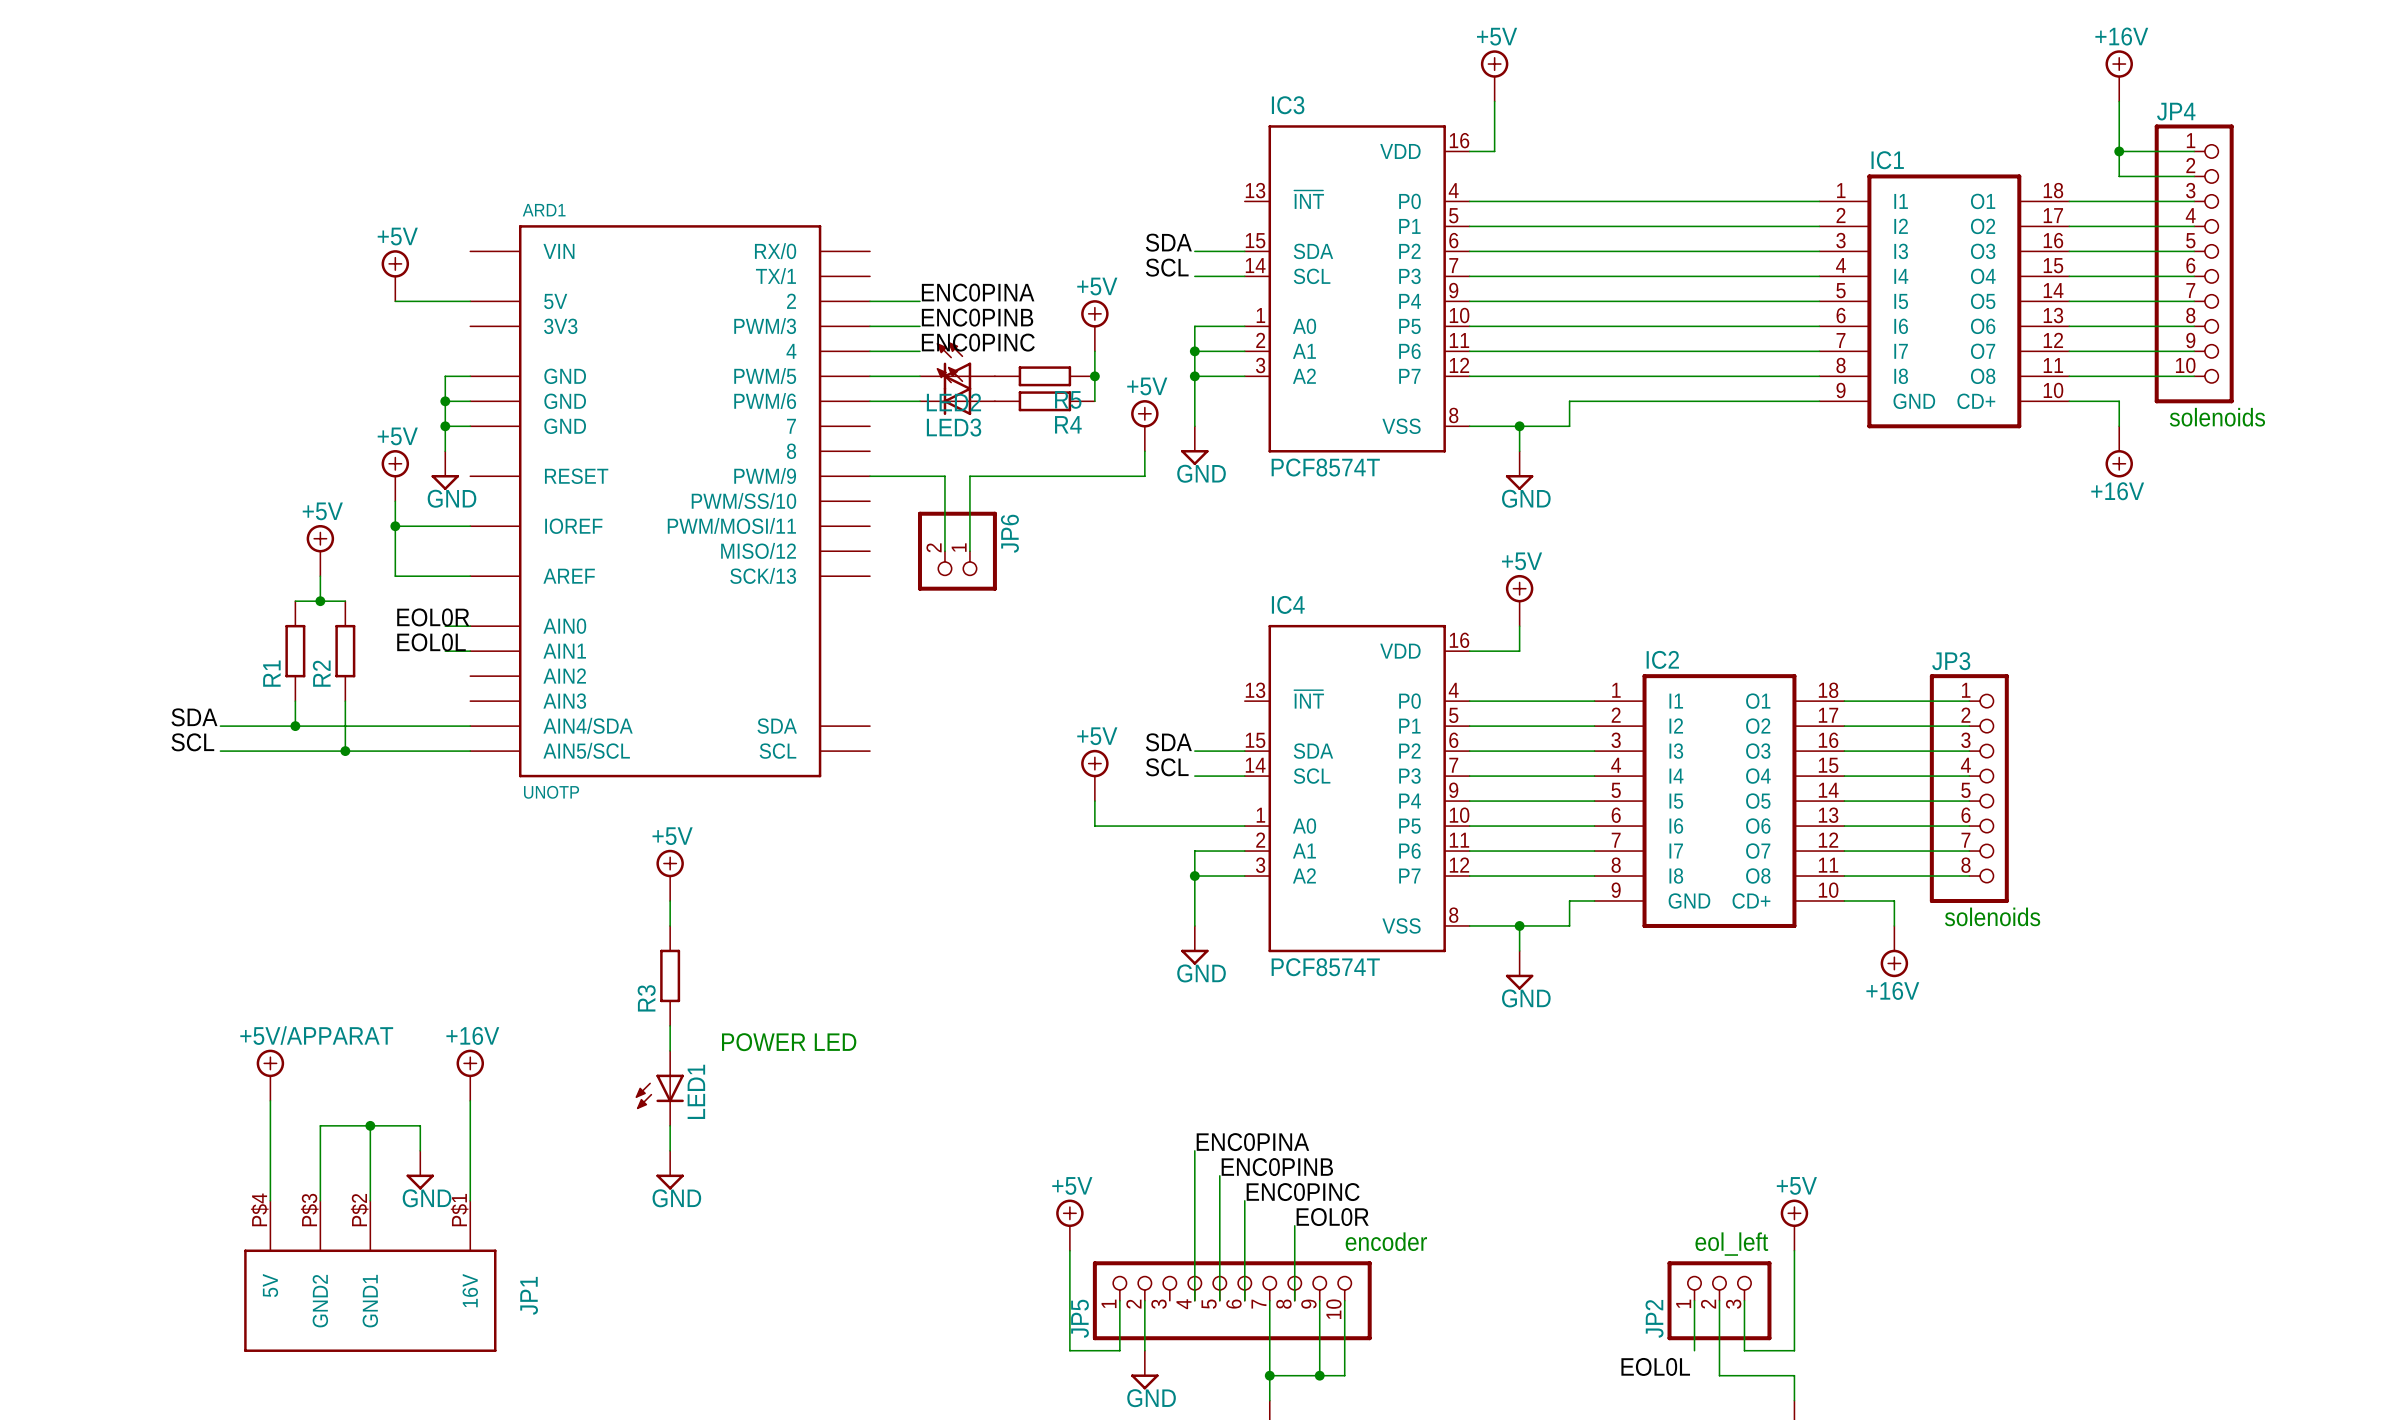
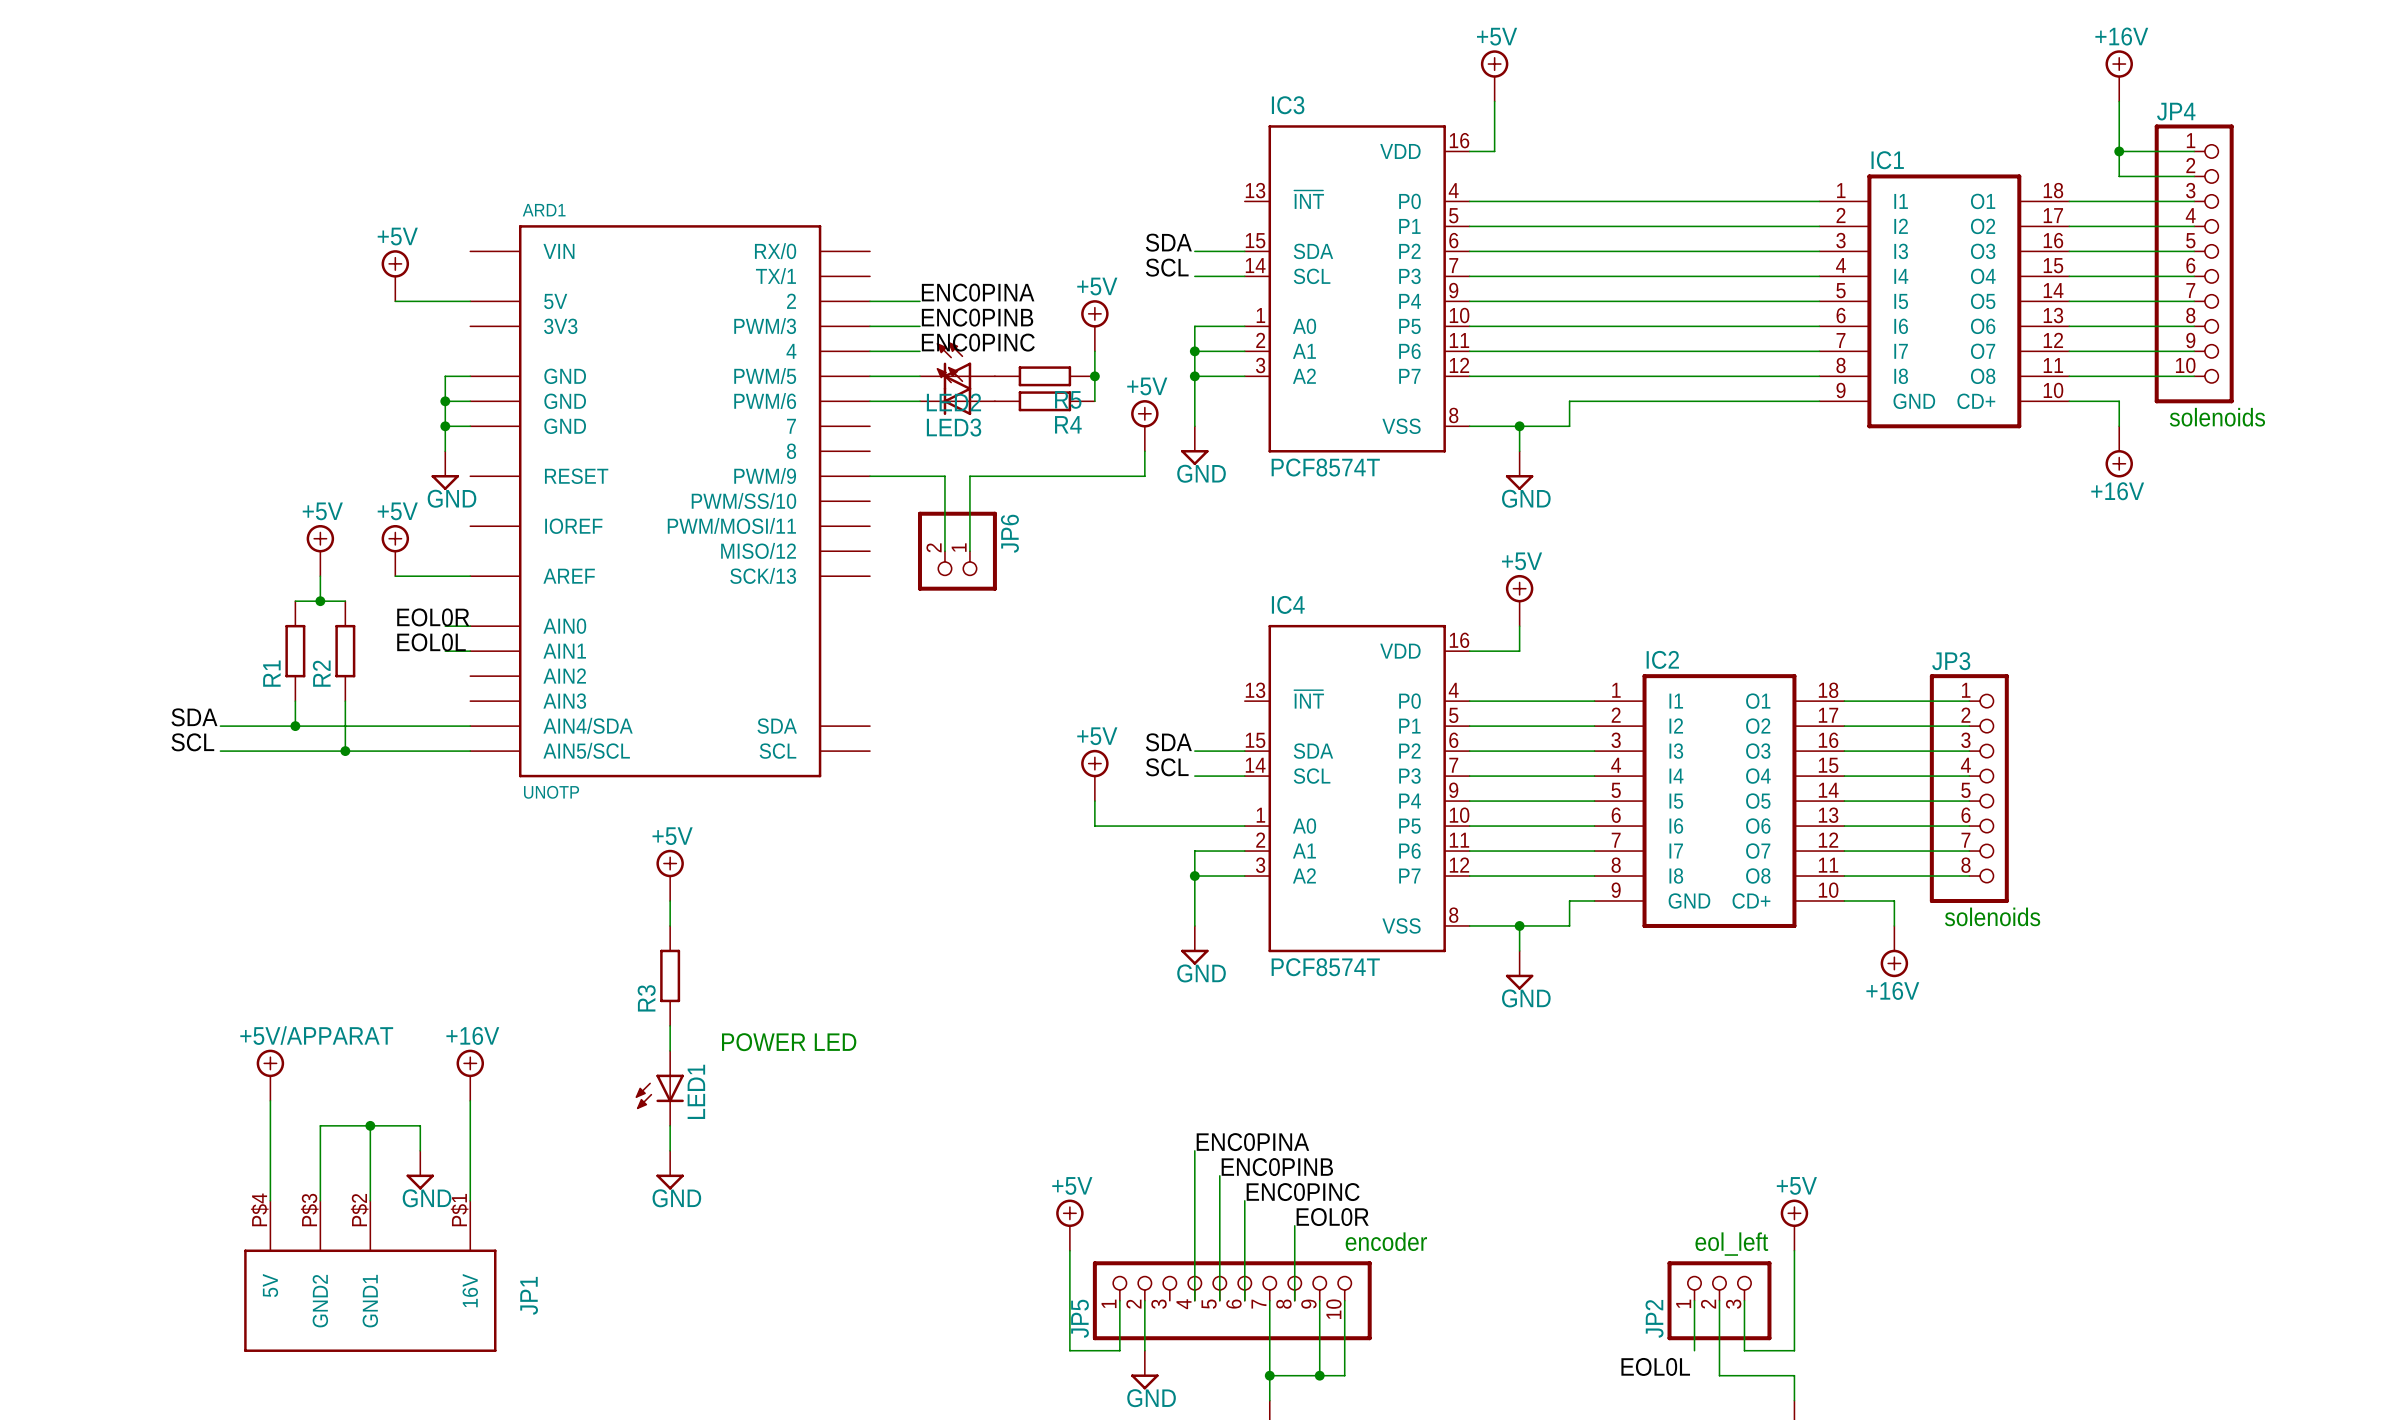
power symbol position: +5V (395, 475) -> +5V (395, 550)
wire: (395, 526) (470, 526) -> none
junction: (395, 526) -> none

